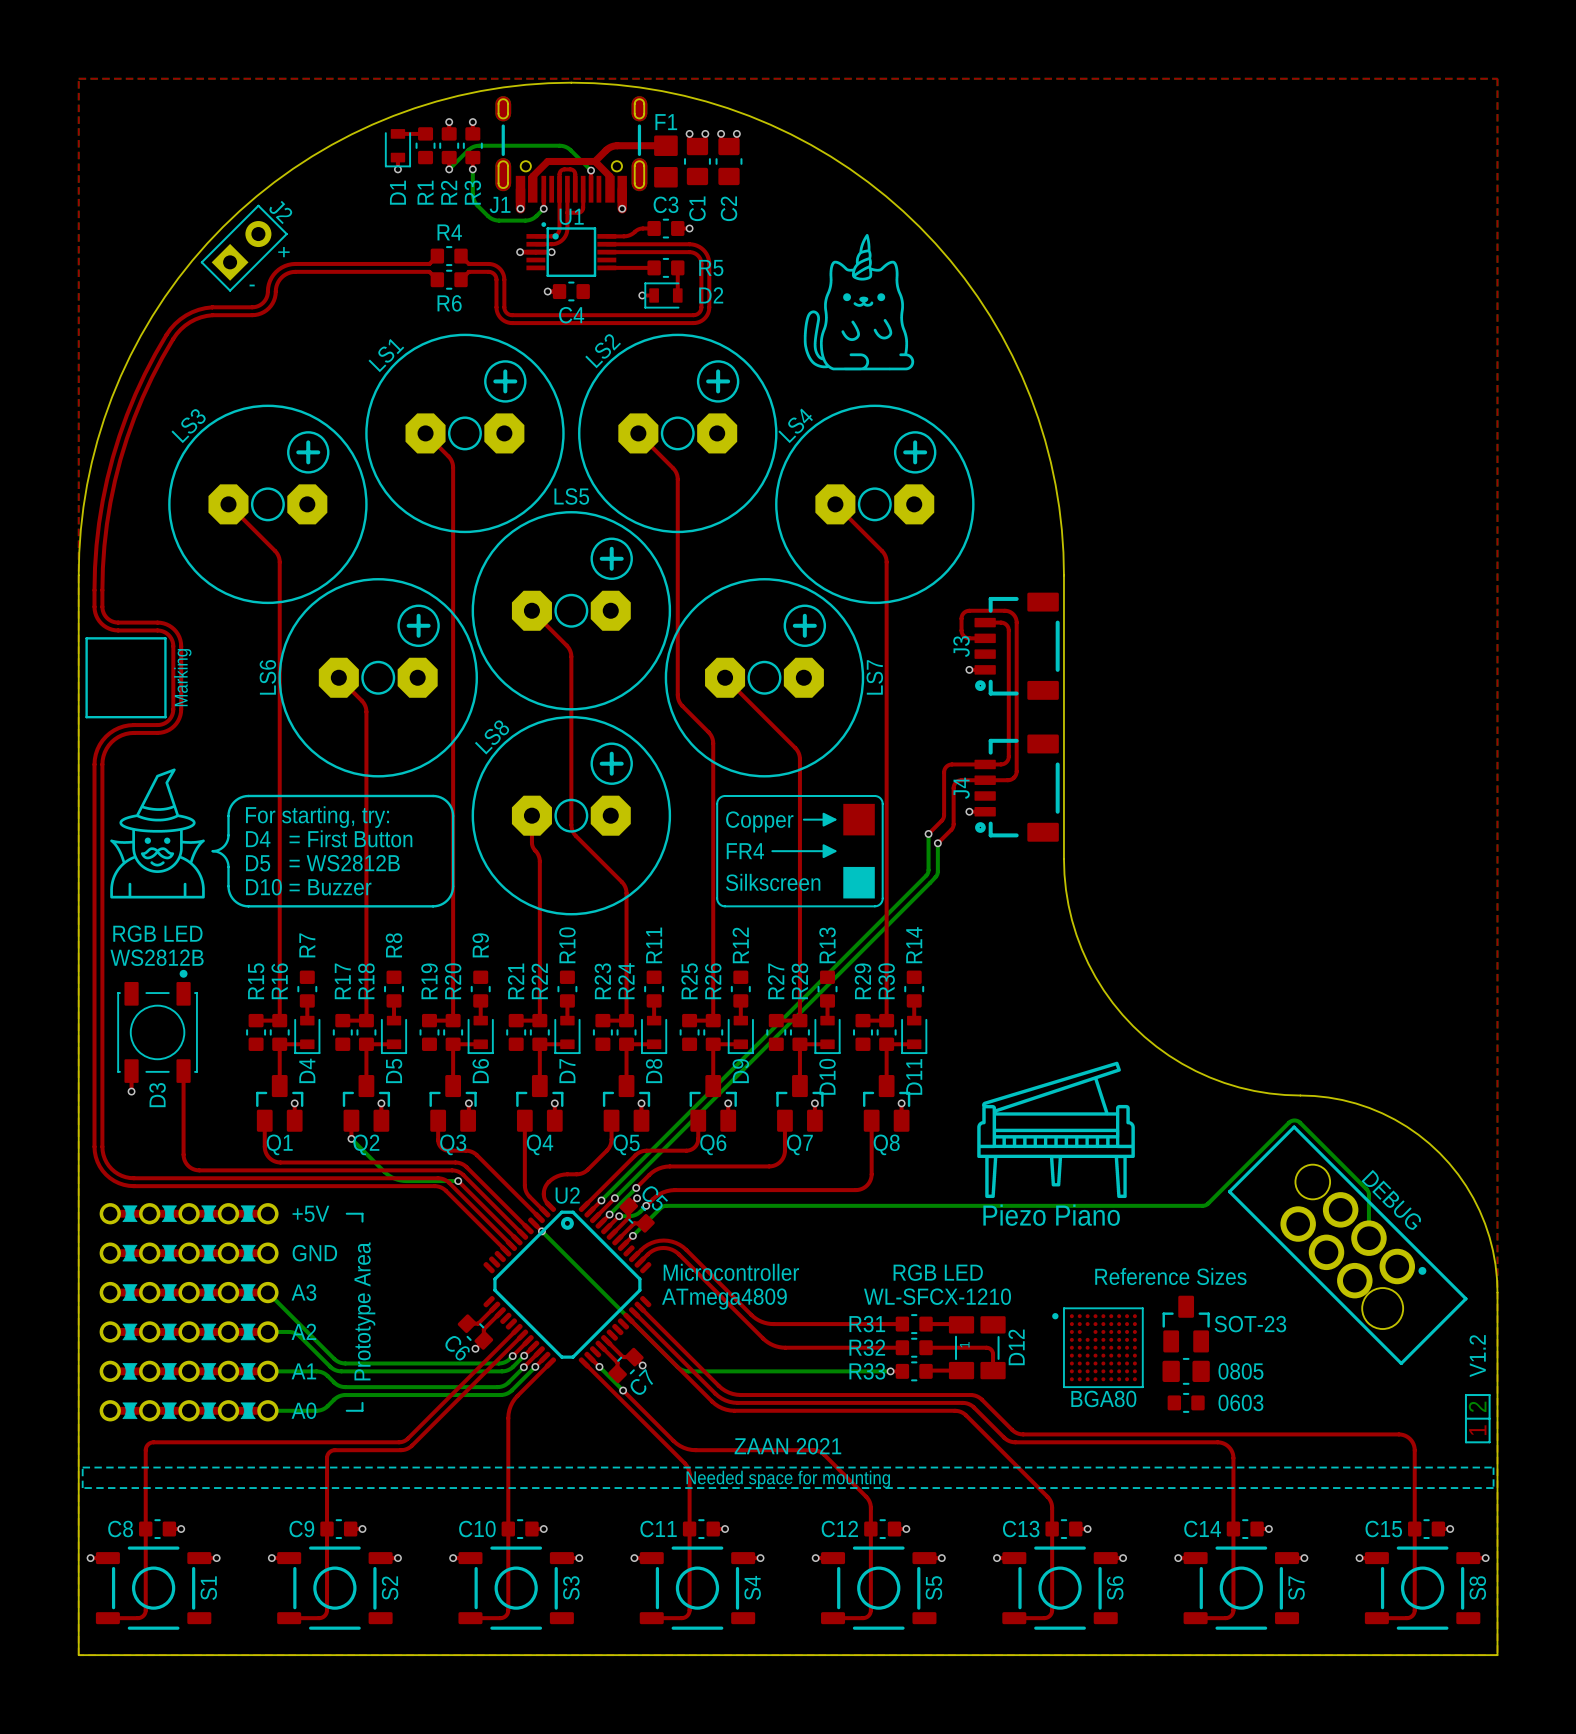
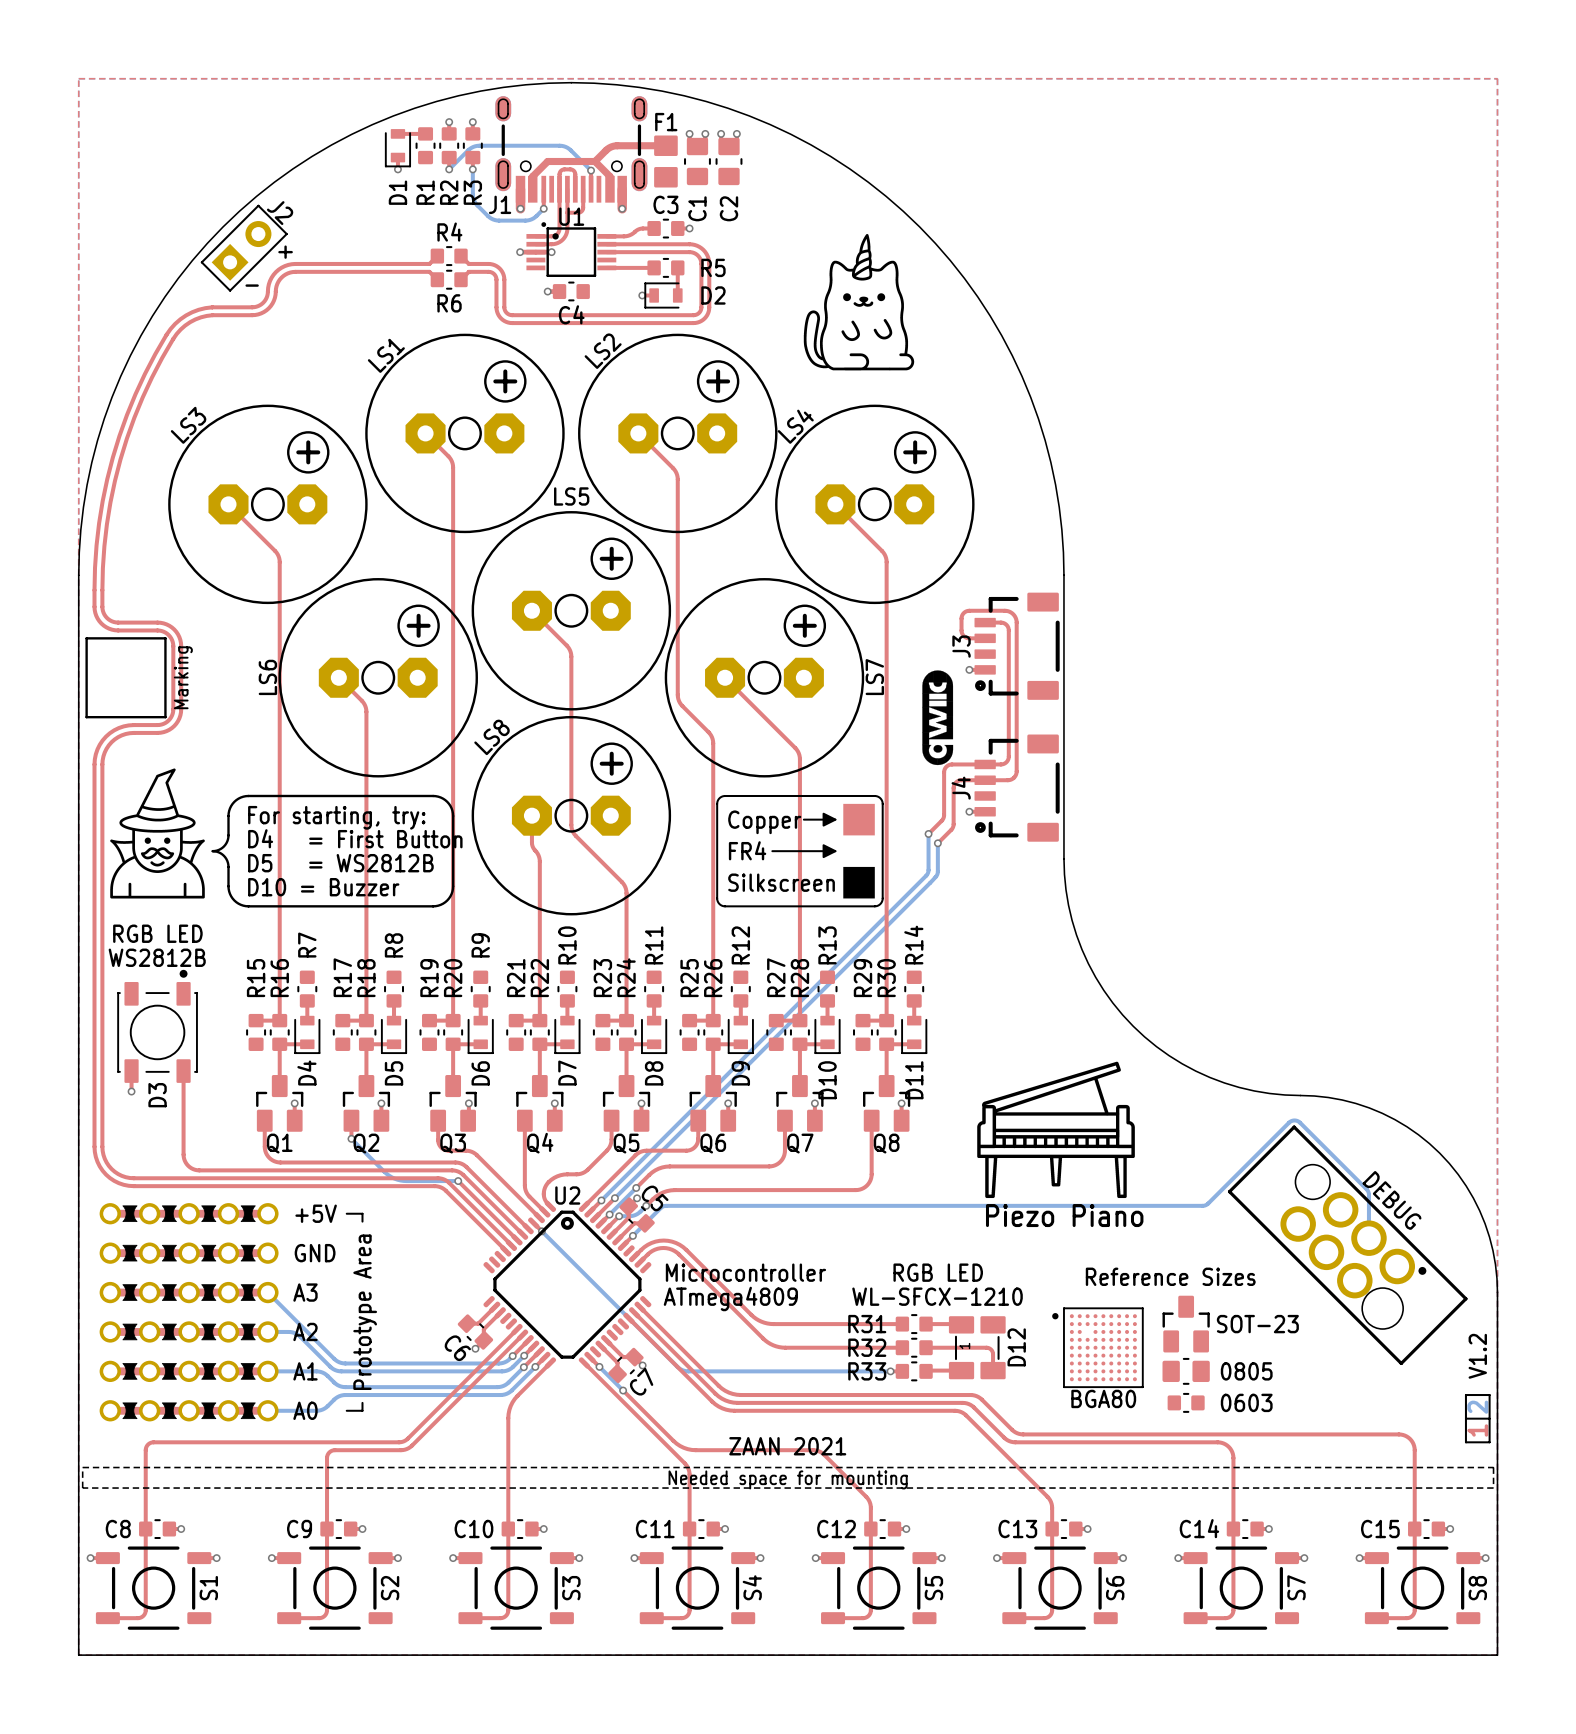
drawing: none -> [922, 670, 954, 766]

